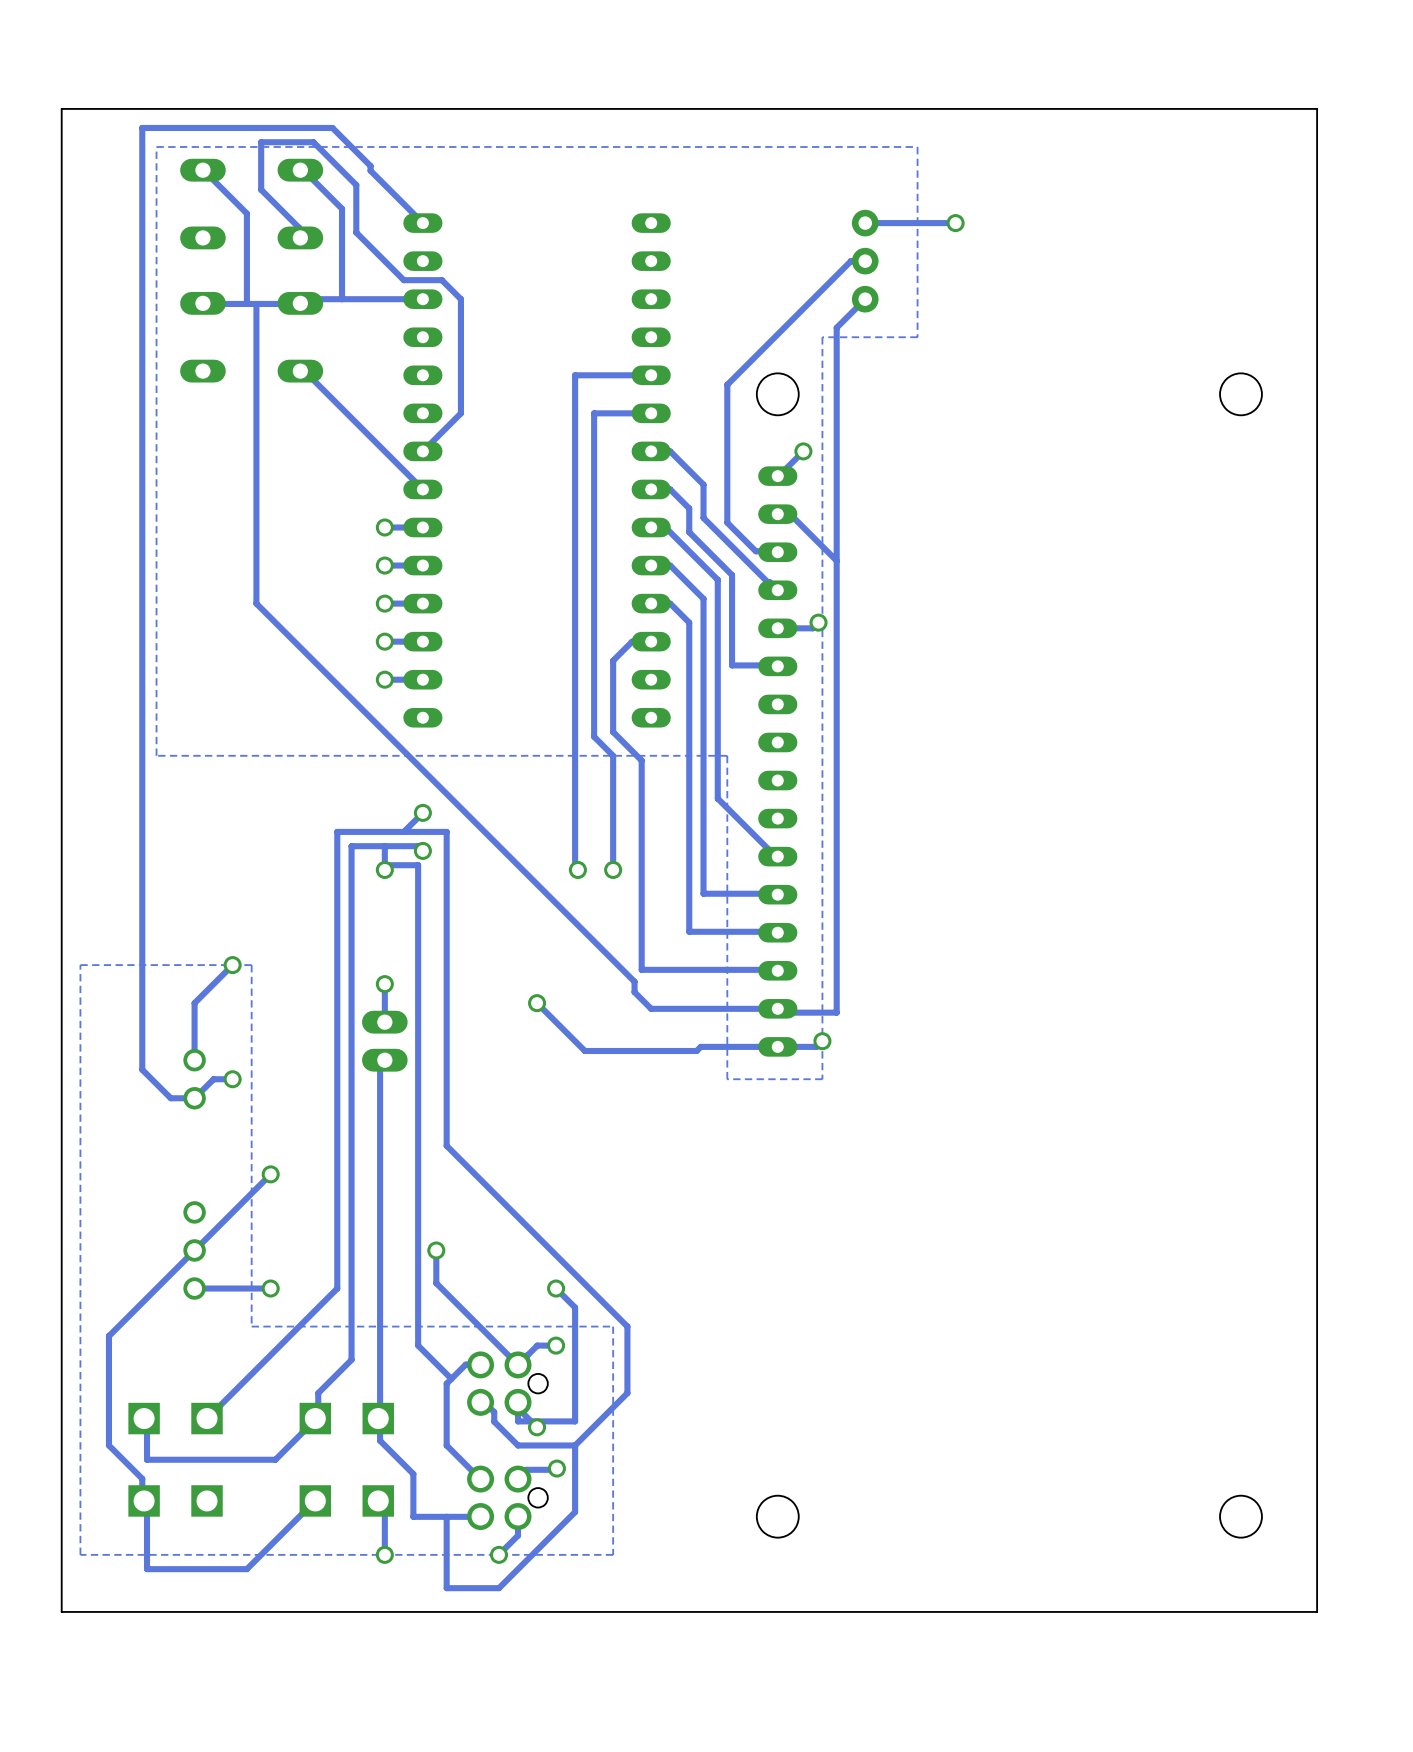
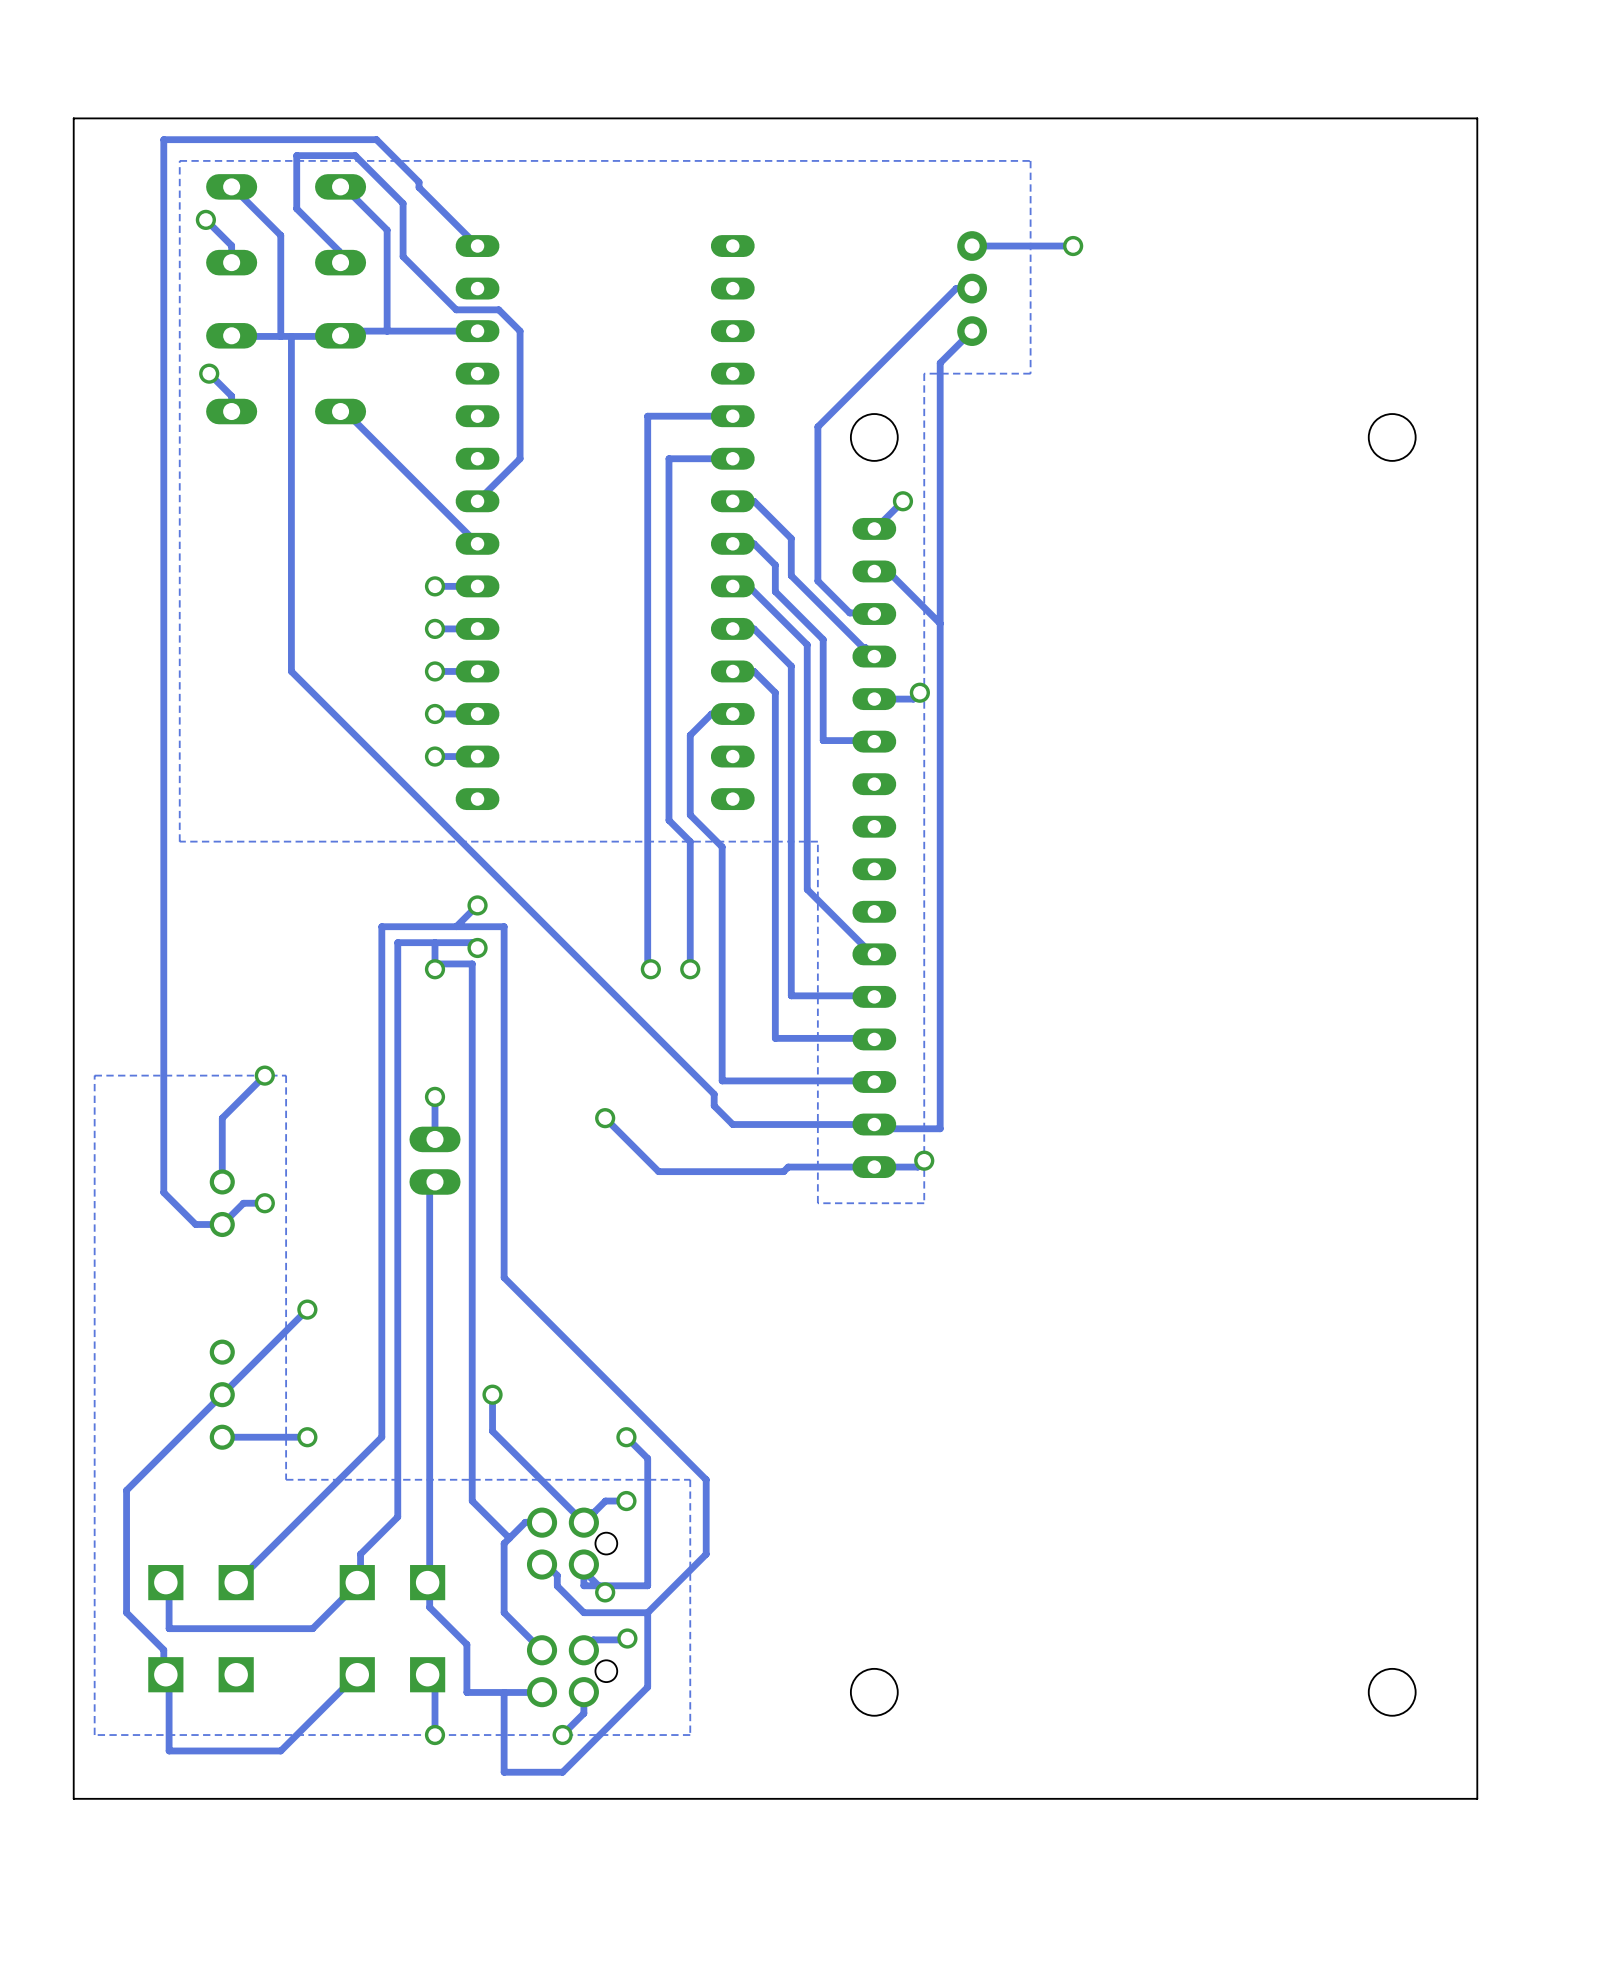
track: none -> (205, 219) (231, 245) (231, 262)
via: none -> (205, 219)
track: none -> (209, 373) (231, 396) (231, 411)
via: none -> (209, 373)

